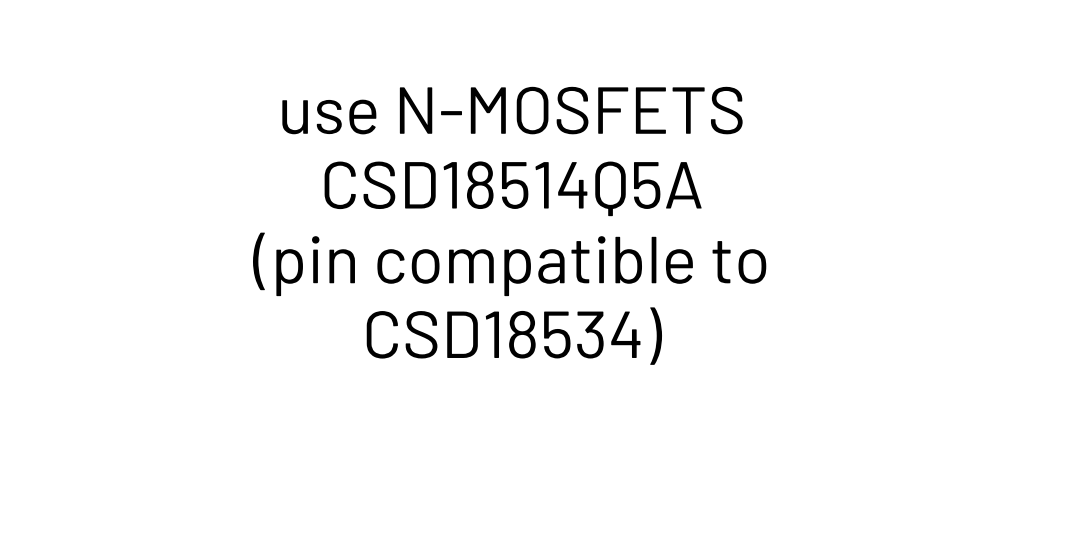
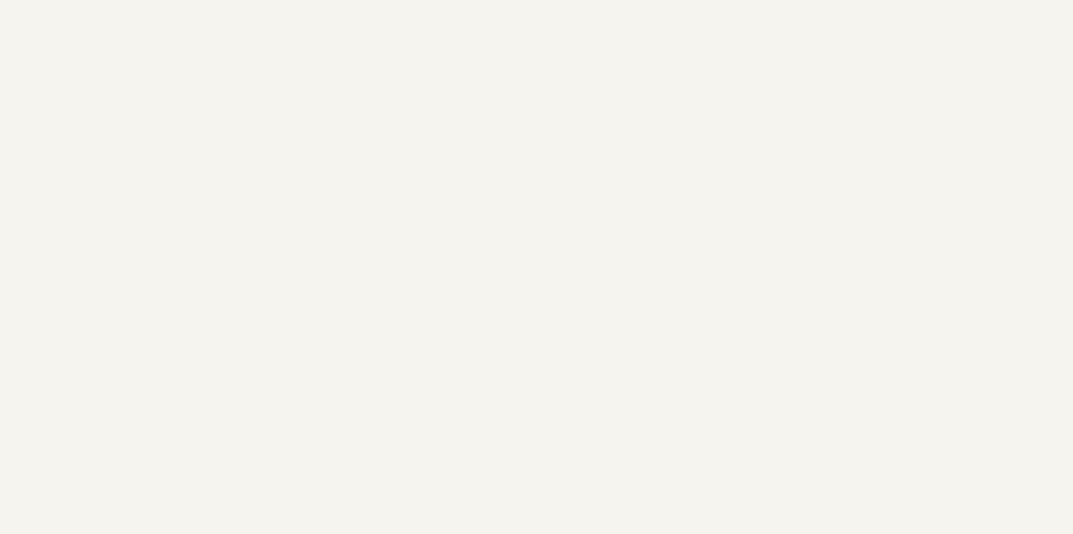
text: use N-MOSFETS (512, 110) -> none
text: CSD18514Q5A (513, 188) -> none
text: (pin compatible to (509, 264) -> none
text: CSD18534) (514, 336) -> none

